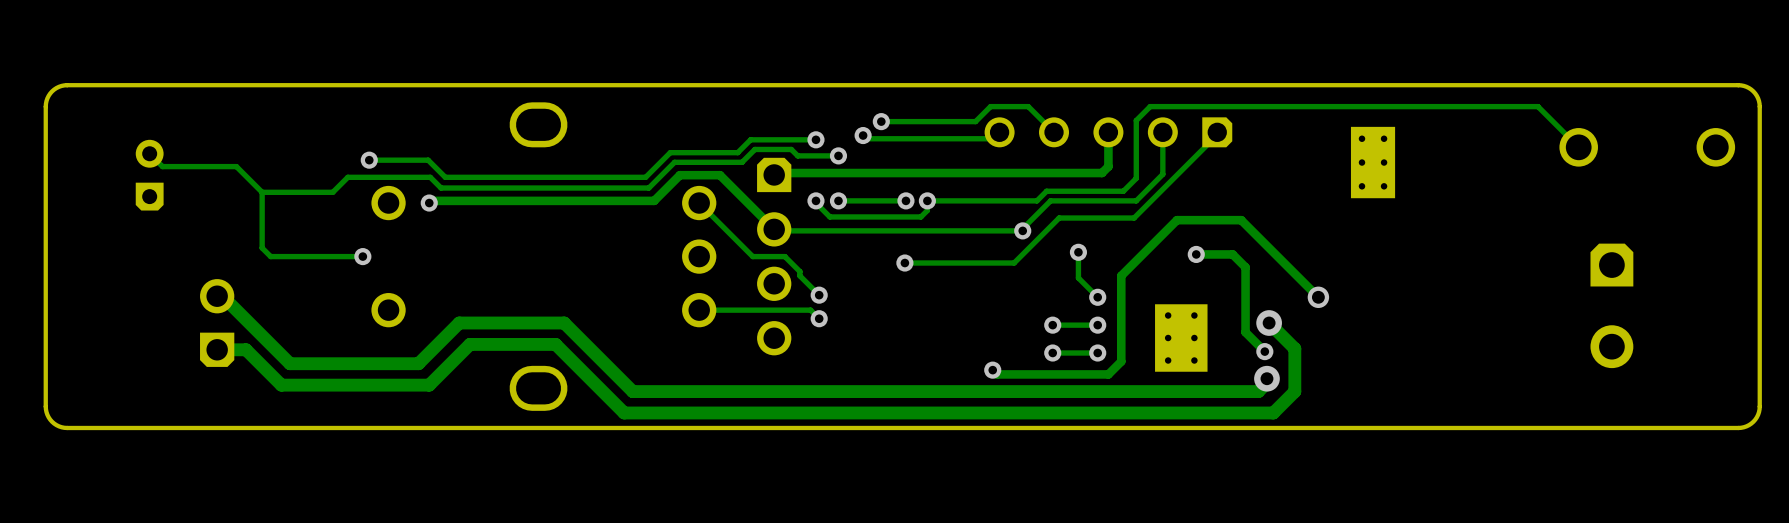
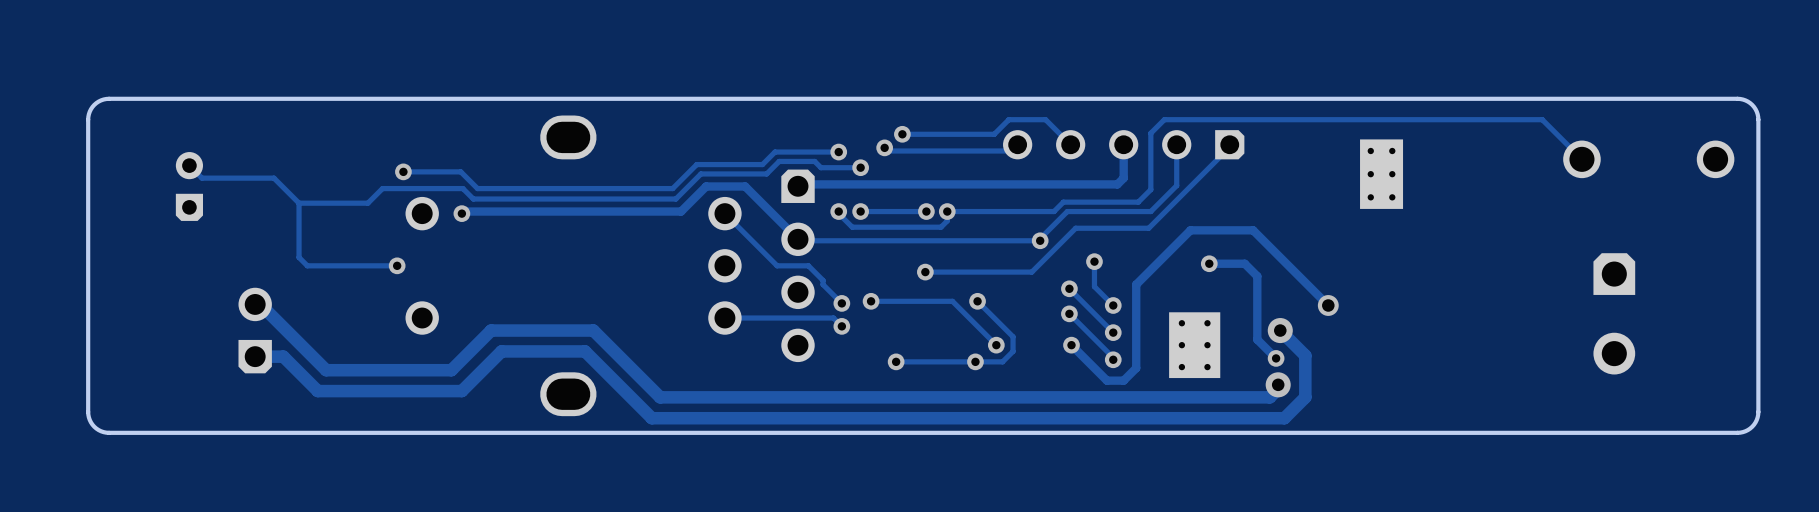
via: none -> (1069, 288)
via: none -> (871, 301)
track: none -> (873, 301) (952, 301) (996, 345)
track: none -> (977, 301) (1013, 336) (1013, 351) (1002, 361) (894, 361)
via: none -> (977, 301)
via: none -> (1069, 313)
via: (1052, 325) -> none
track: (1097, 325) (1052, 325) -> (1113, 332) (1069, 288)
via: none -> (996, 345)
via: none -> (1071, 345)
via: (1052, 353) -> none
track: (1097, 353) (1054, 353) -> (1113, 359) (1069, 313)
via: none -> (896, 361)
via: none -> (975, 361)
track: (992, 370) (997, 374) (1091, 374) -> (1071, 345) (1106, 380)
via: (992, 370) -> none

